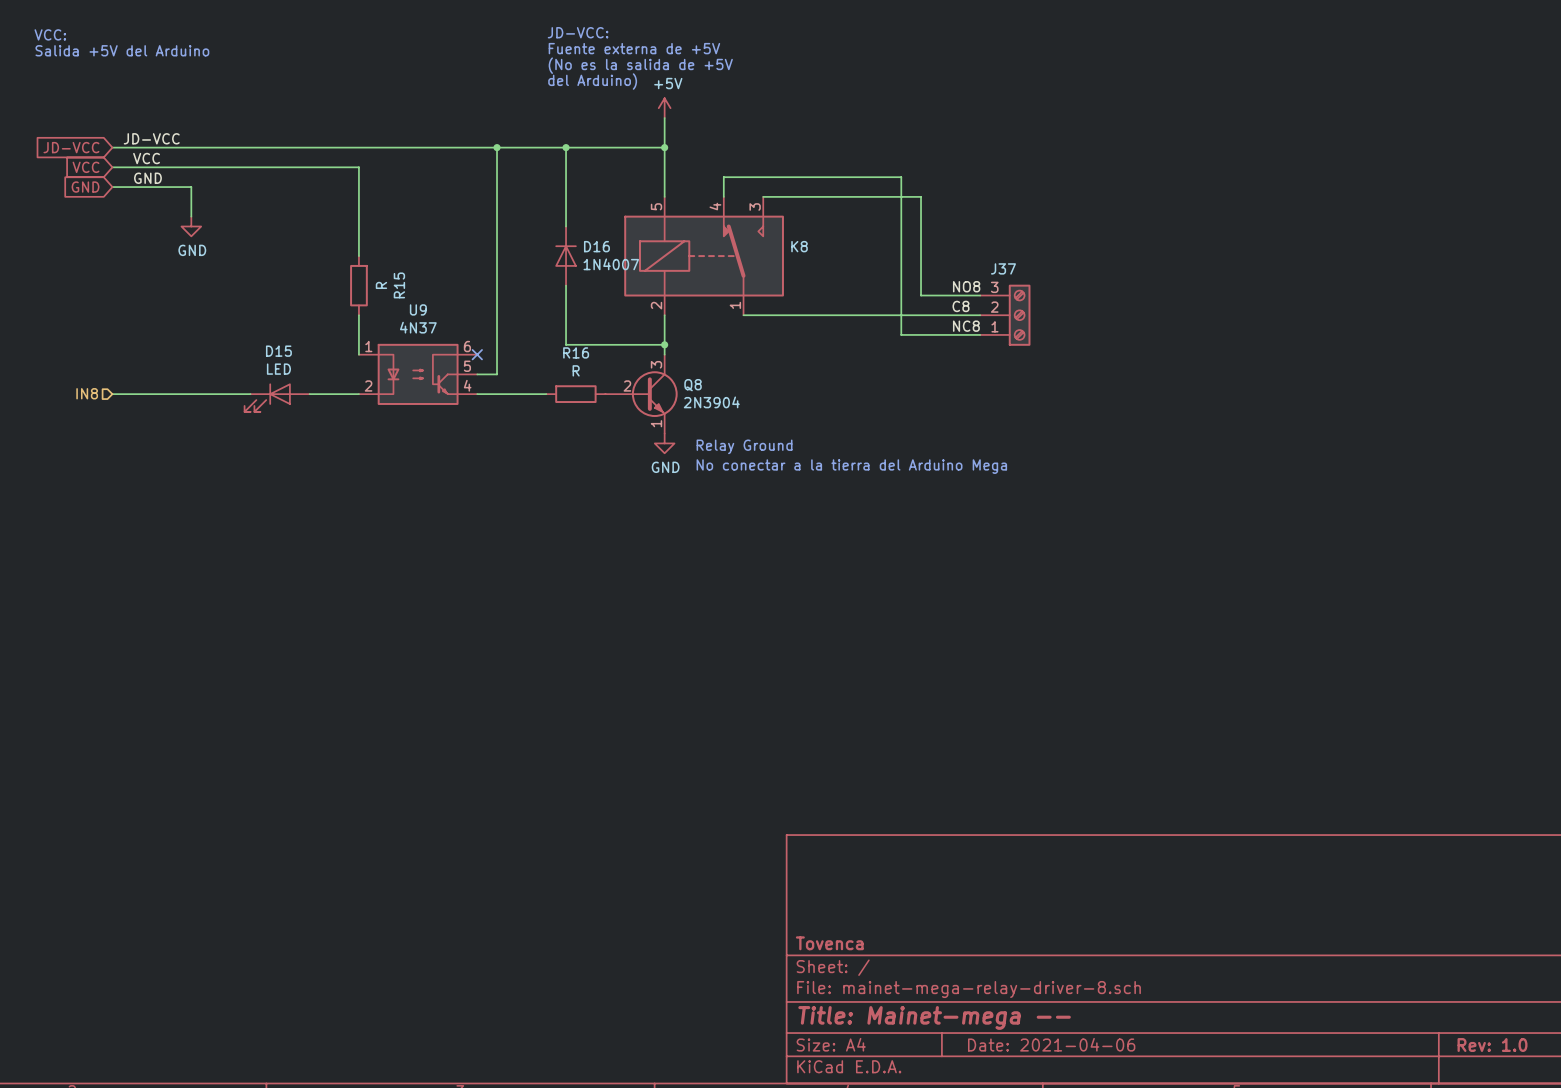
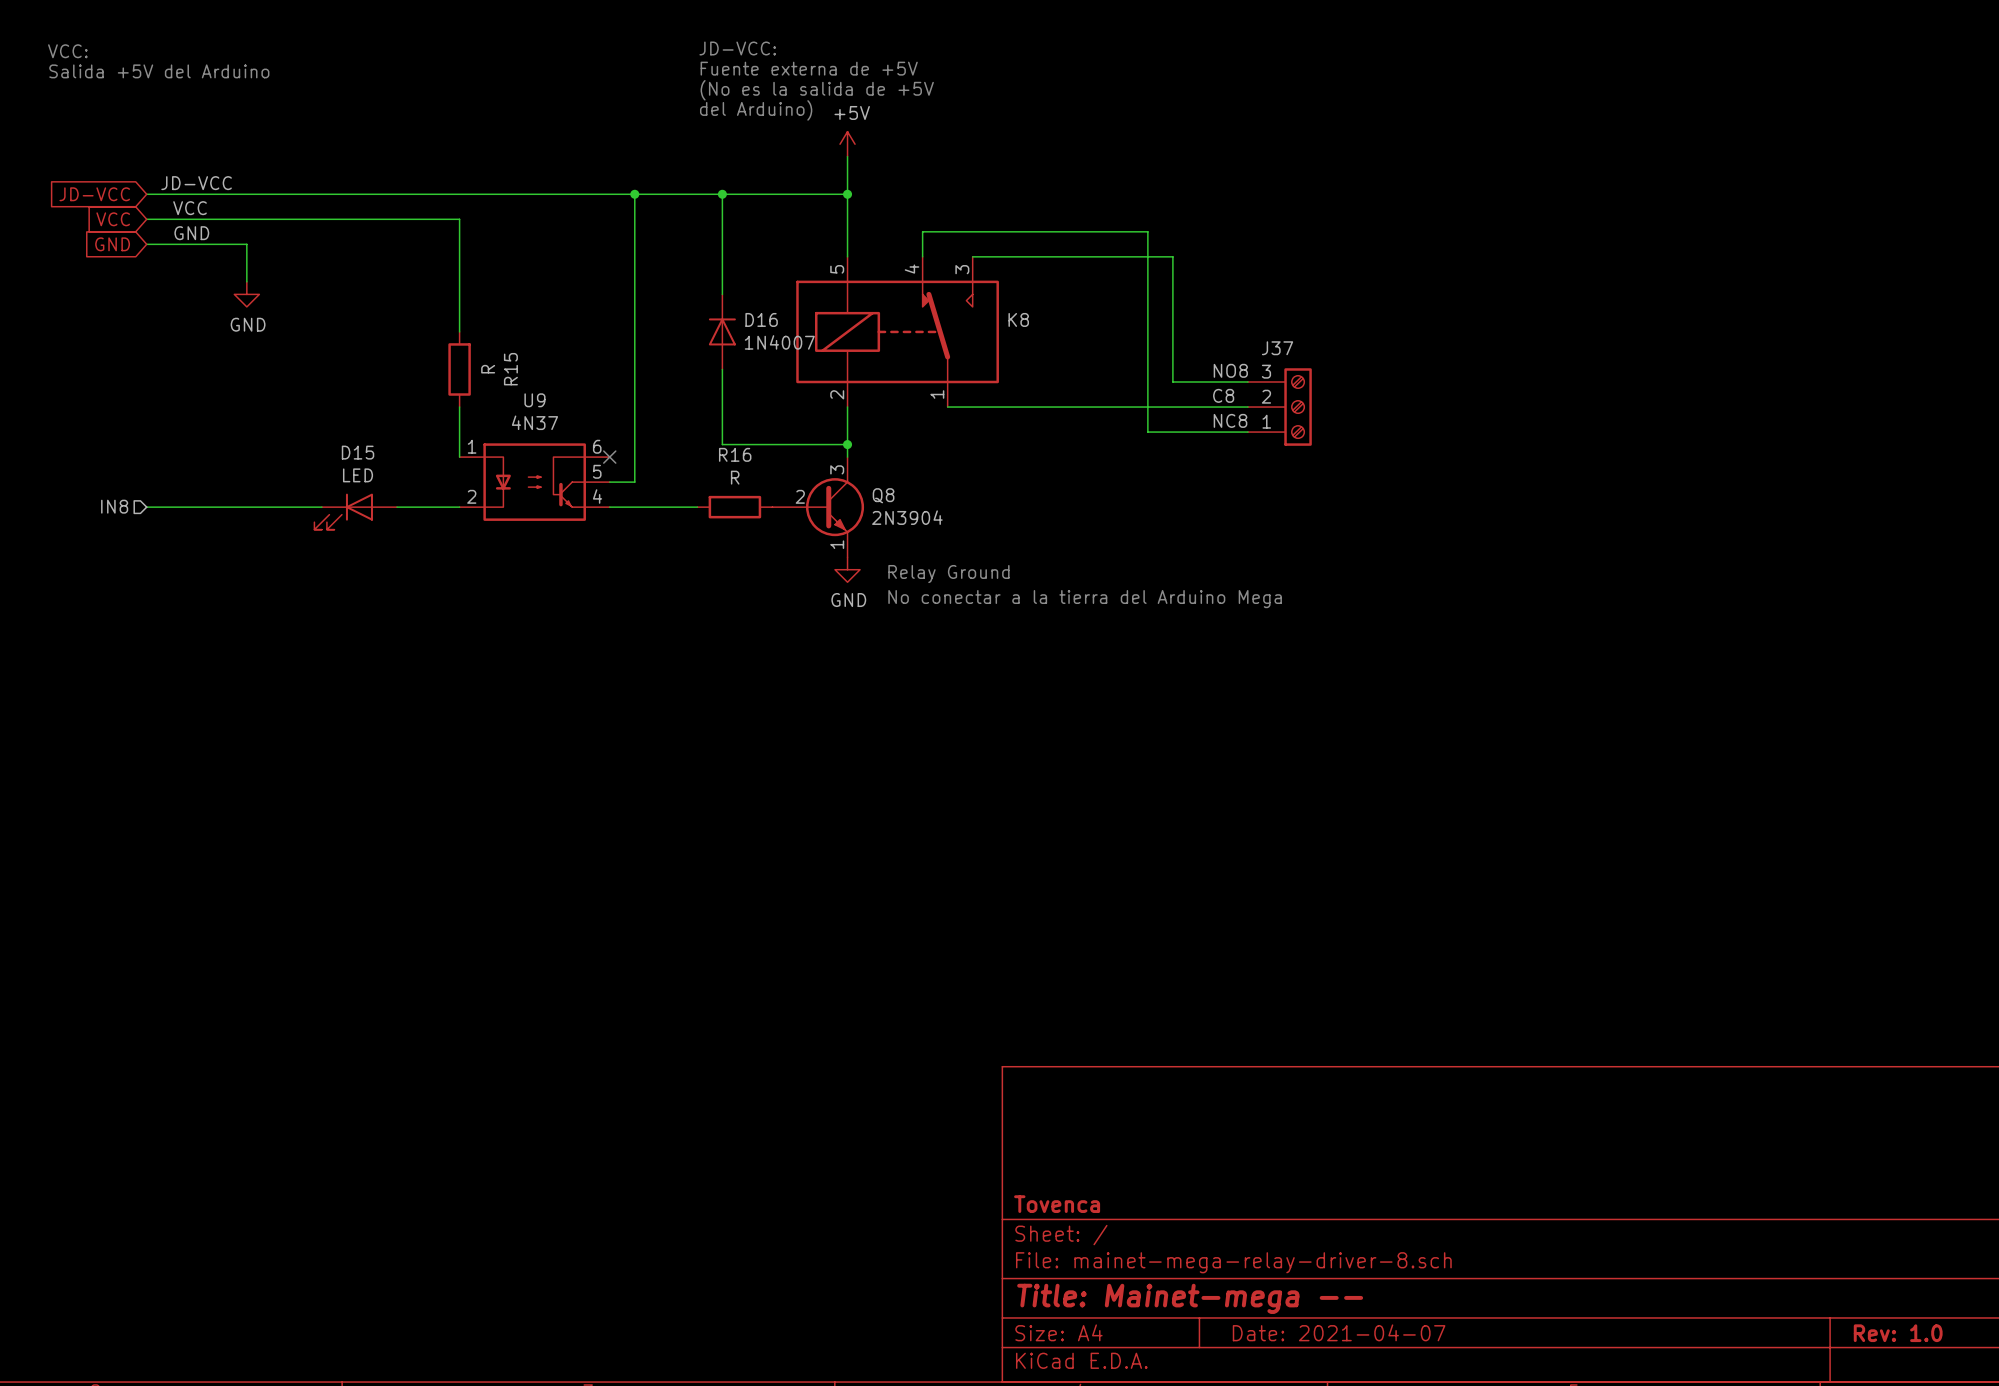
title block: Date: 2021-04-06 (1051, 1044) -> Date: 2021-04-07 (1339, 1332)

